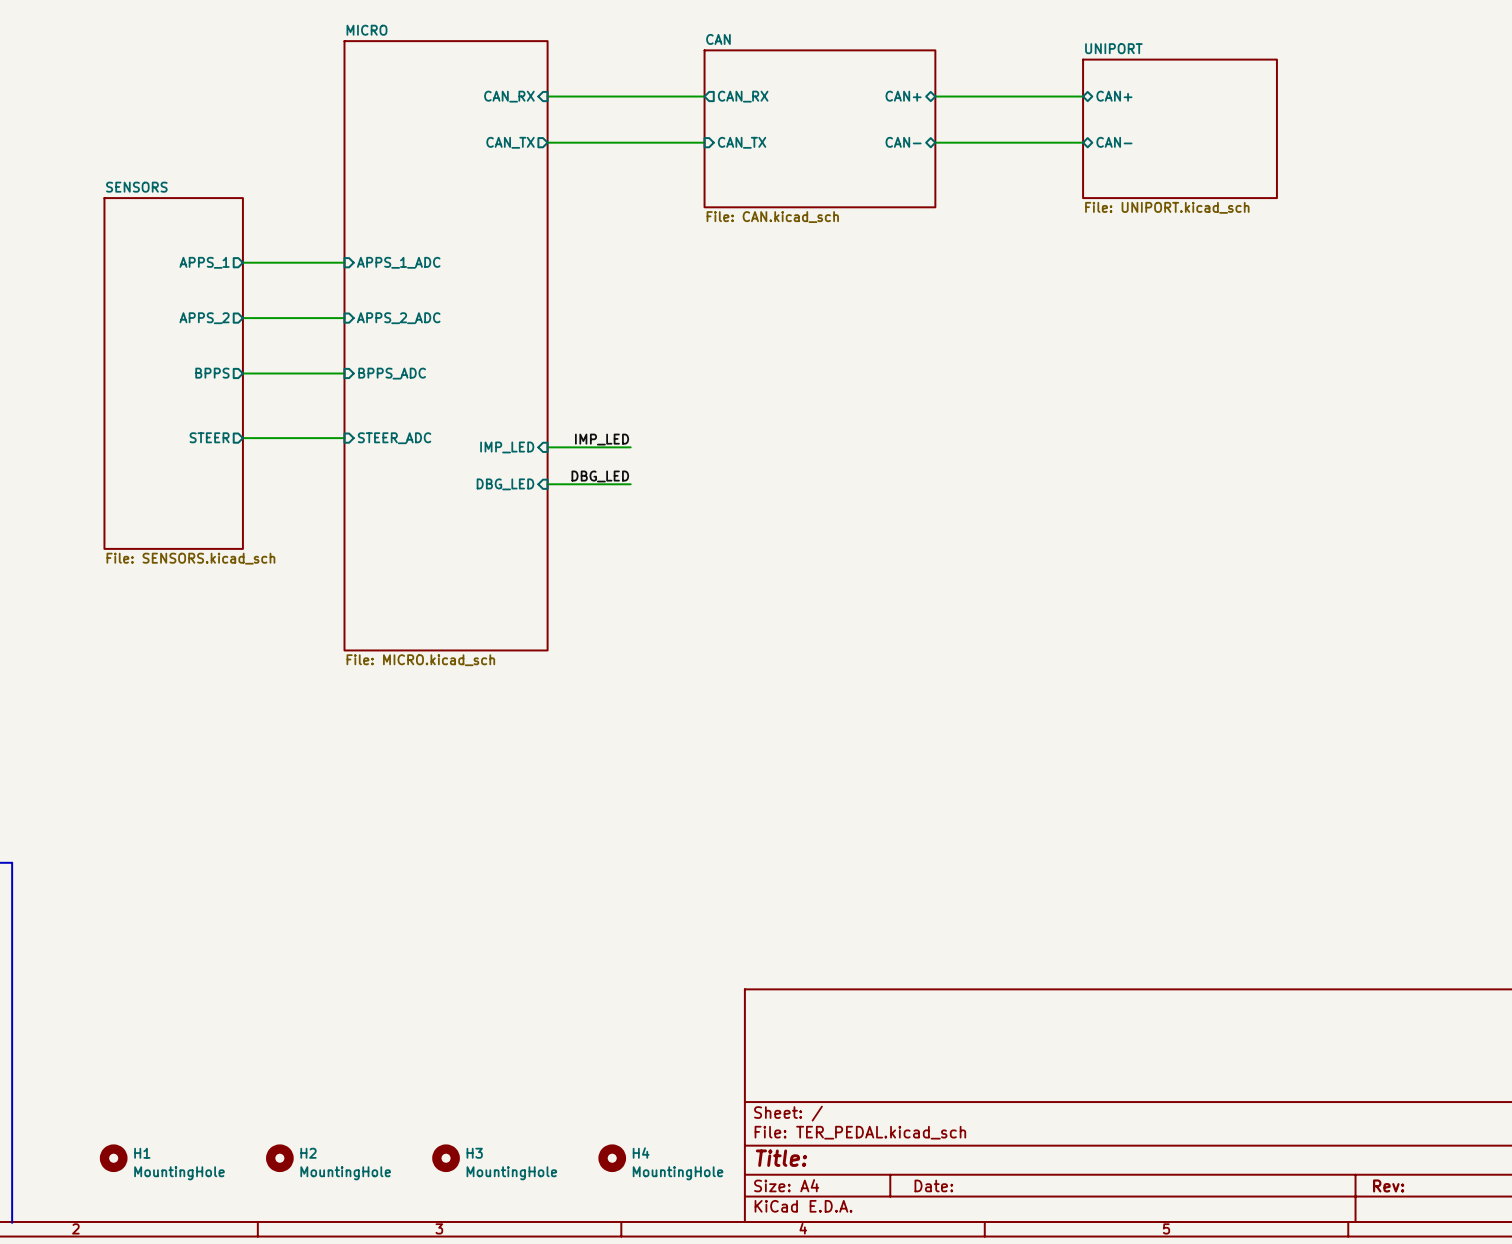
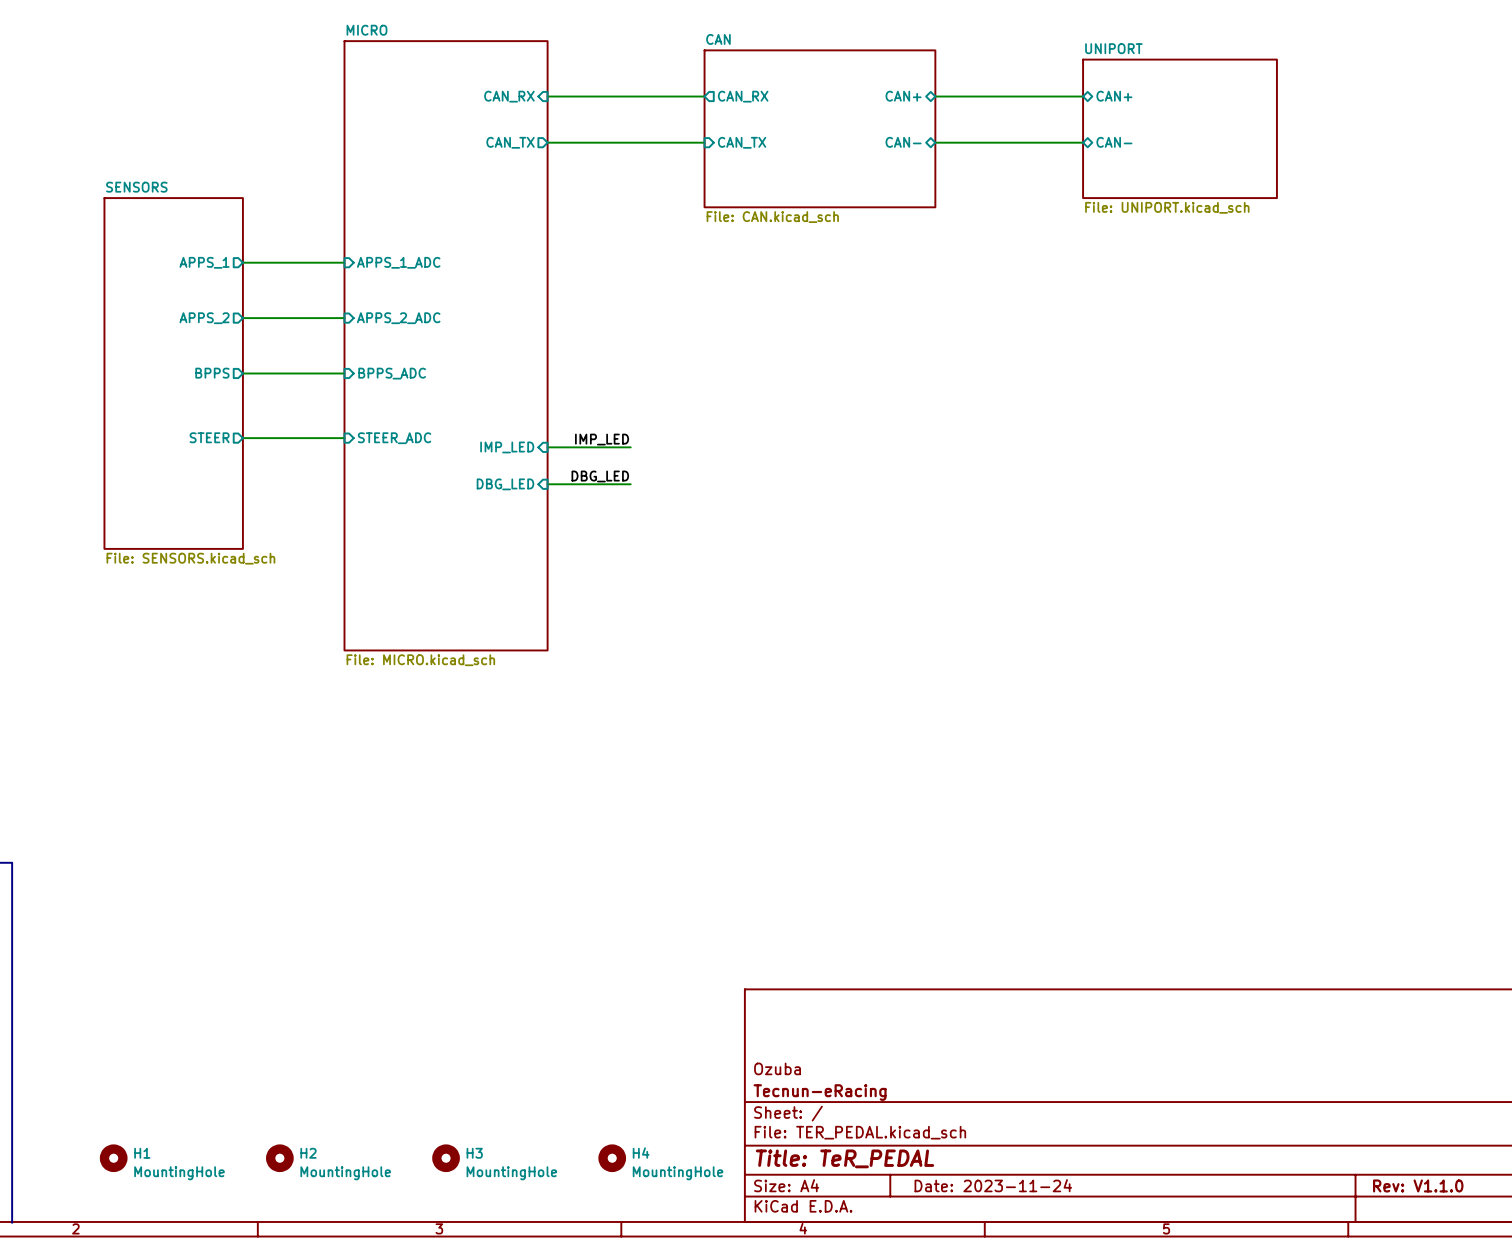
title block: none -> Ozuba (777, 1068)
title block: none -> Tecnun-eRacing (820, 1092)
title block: Title: (781, 1158) -> Title: TeR_PEDAL (844, 1158)
title block: Date: (933, 1185) -> Date: 2023-11-24 (993, 1185)
title block: Rev: (1388, 1185) -> Rev: V1.1.0 (1418, 1185)

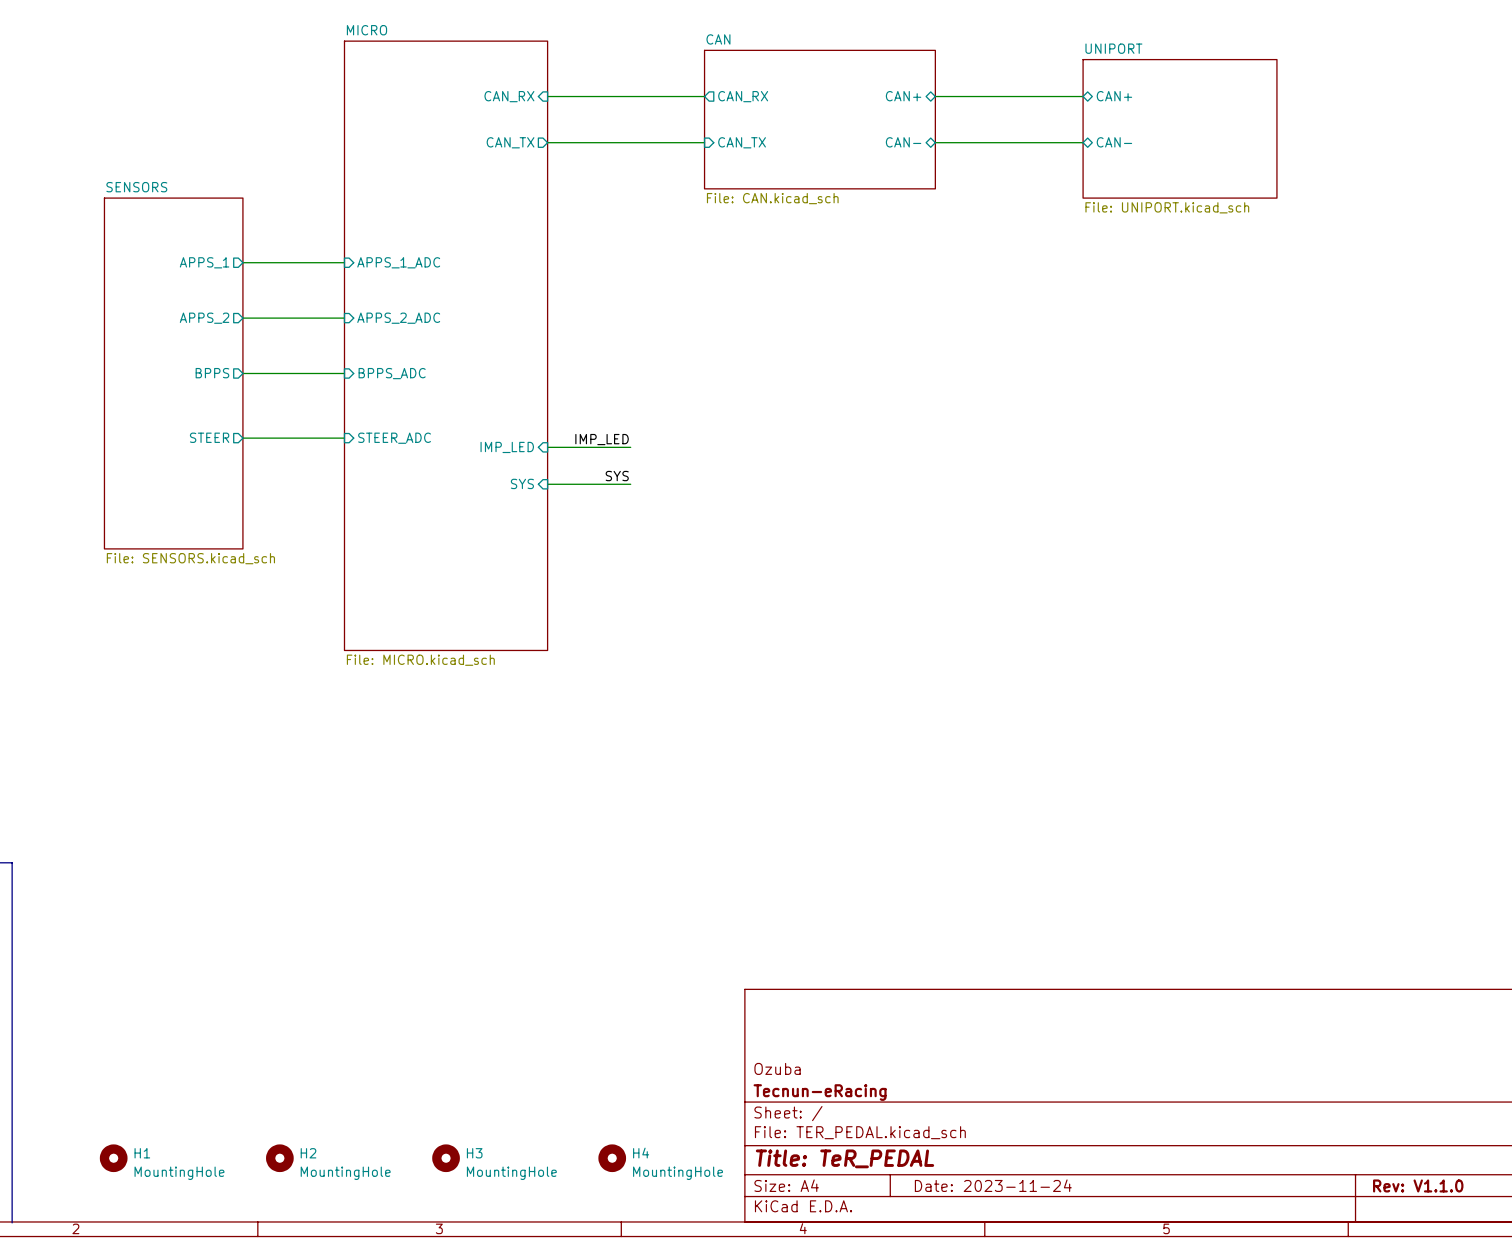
sheet CAN: none -> File: CAN.kicad_sch (819, 119)
sheet CAN: File: CAN.kicad_sch (819, 128) -> none
label: DBG_LED (600, 476) -> SYS (617, 476)
sheet pin: DBG_LED (505, 484) -> SYS (522, 483)

